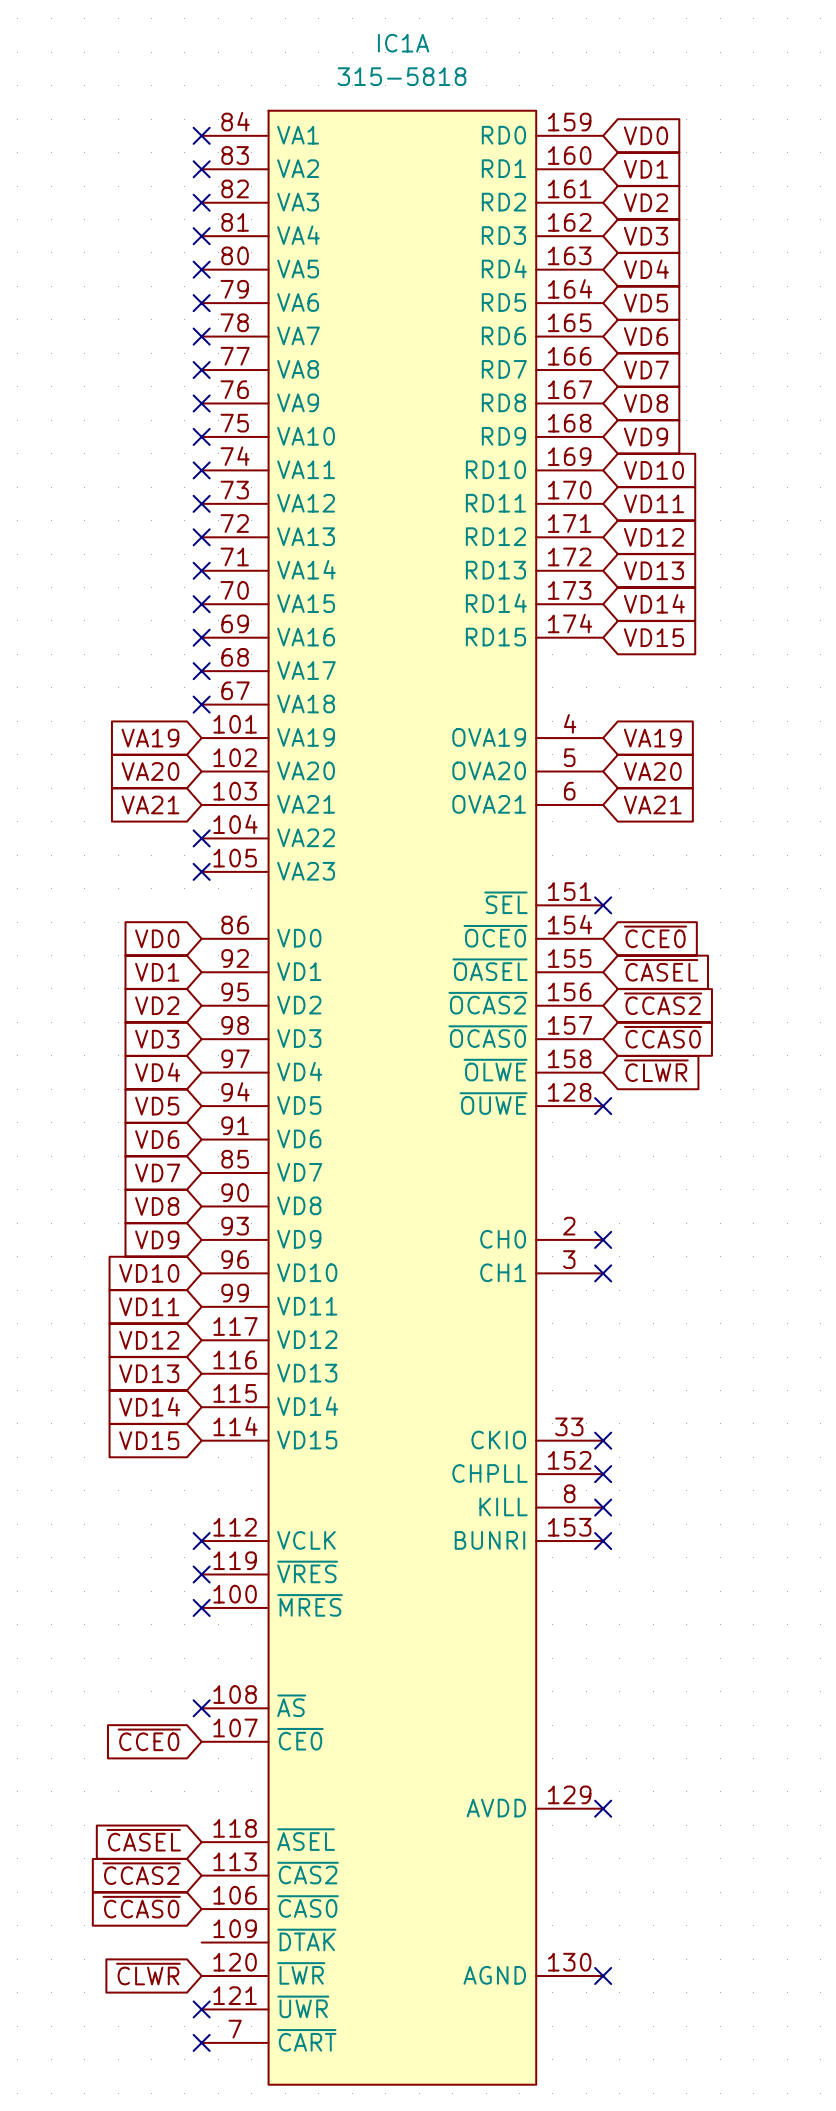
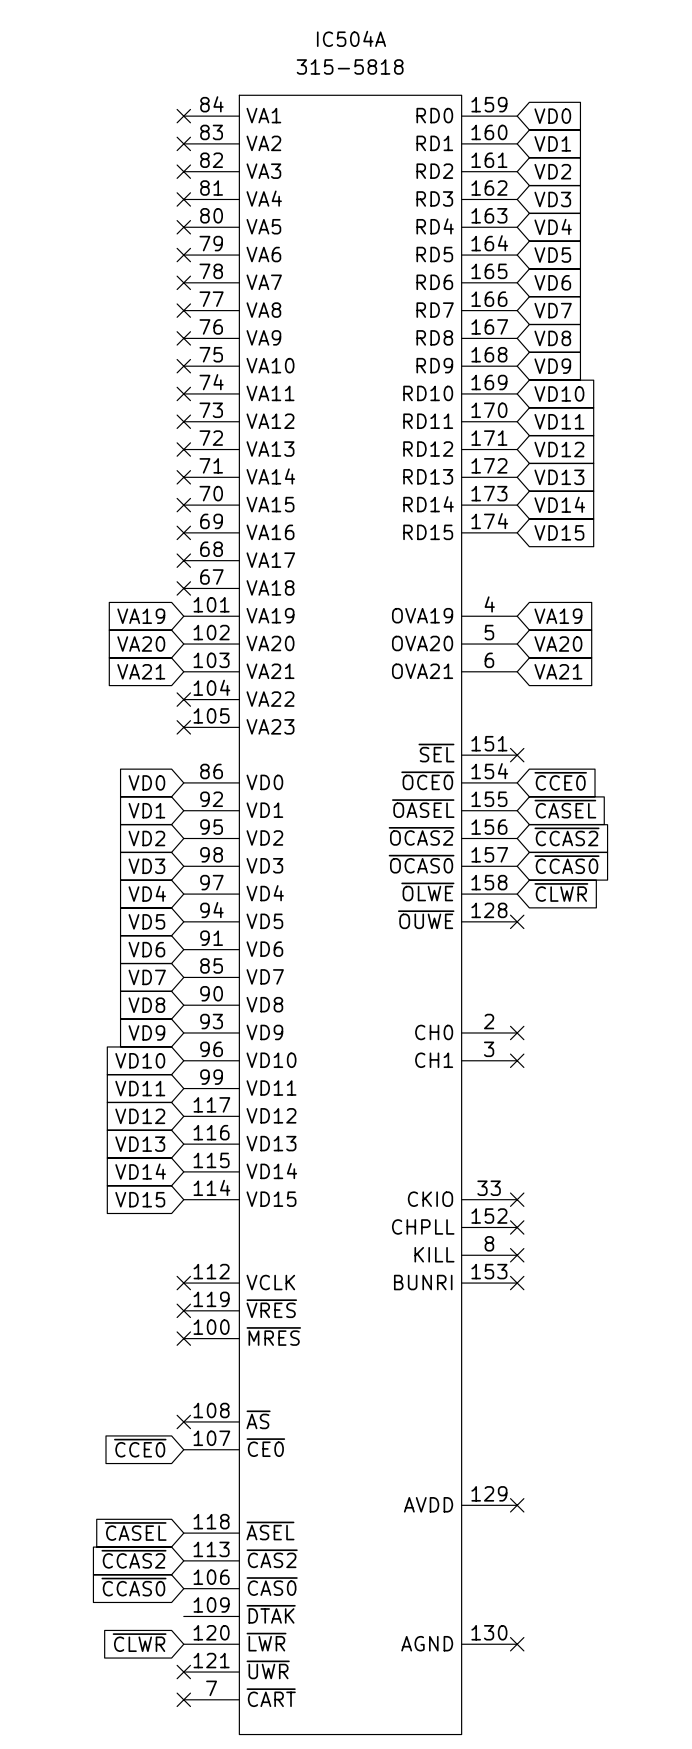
IC1A name: IC1A (403, 43) -> IC504A (351, 38)

